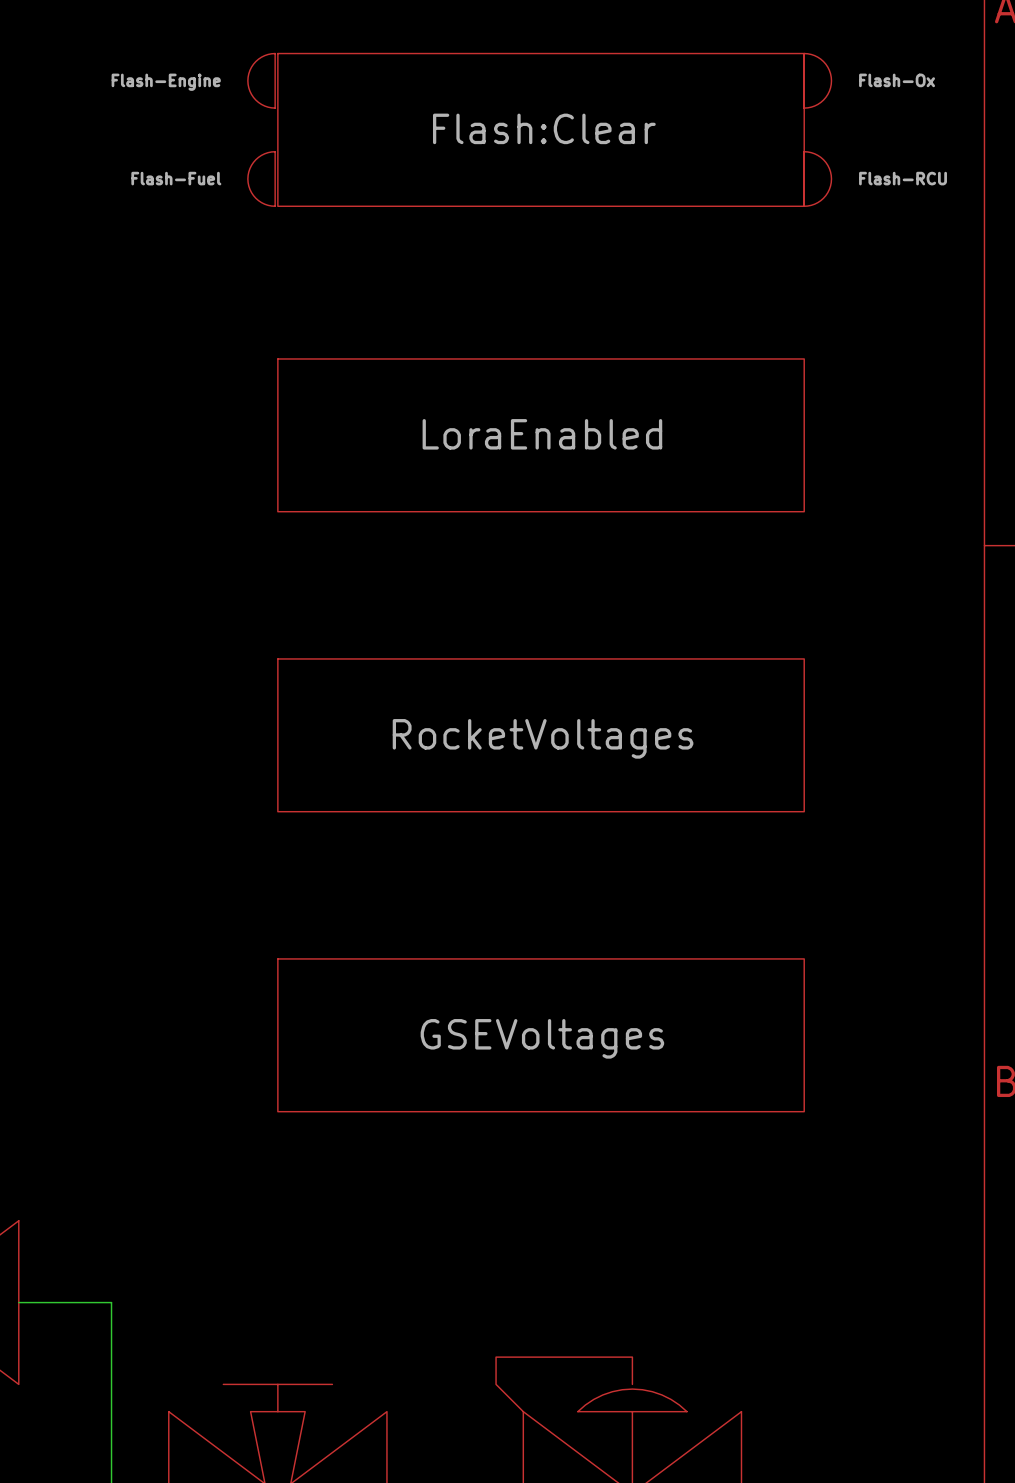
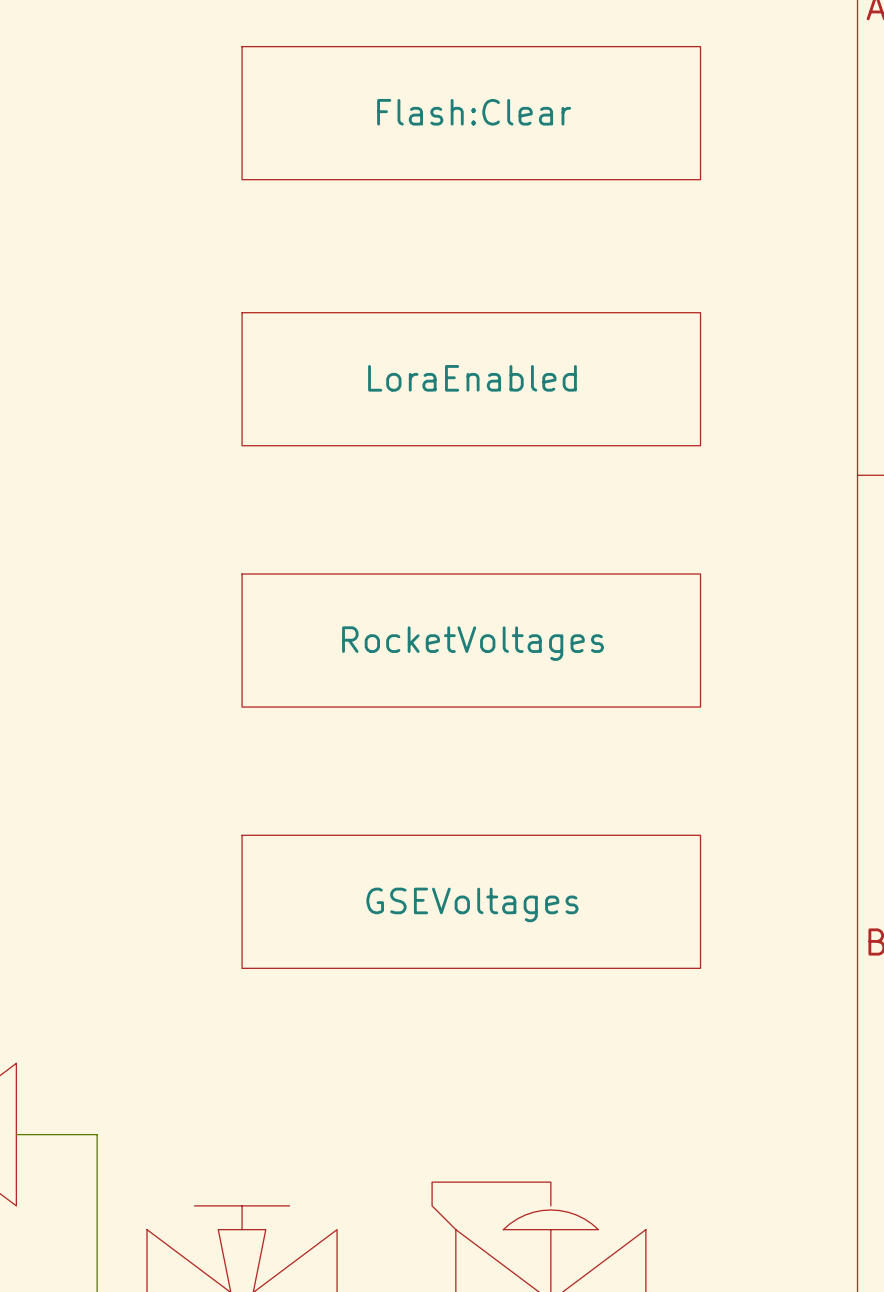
Flash-Engine: (261, 80) -> none
Flash-Ox: (817, 80) -> none
Flash-Fuel: (261, 178) -> none
Flash-RCU: (817, 178) -> none

